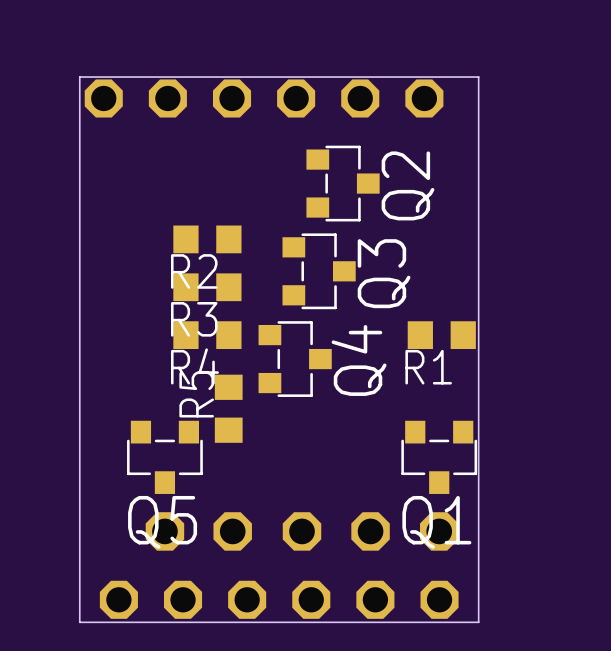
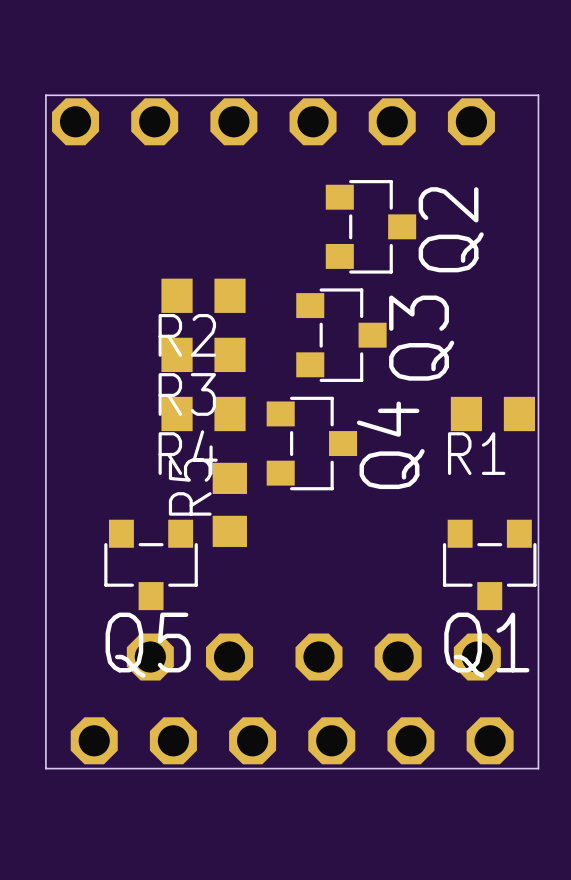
part footprint: [351, 512, 390, 551] -> [295, 633, 501, 681]
part: (164, 531) -> none
part: none -> (189, 657)
part: (232, 531) -> none
part: (302, 531) -> none
part: (439, 531) -> none

